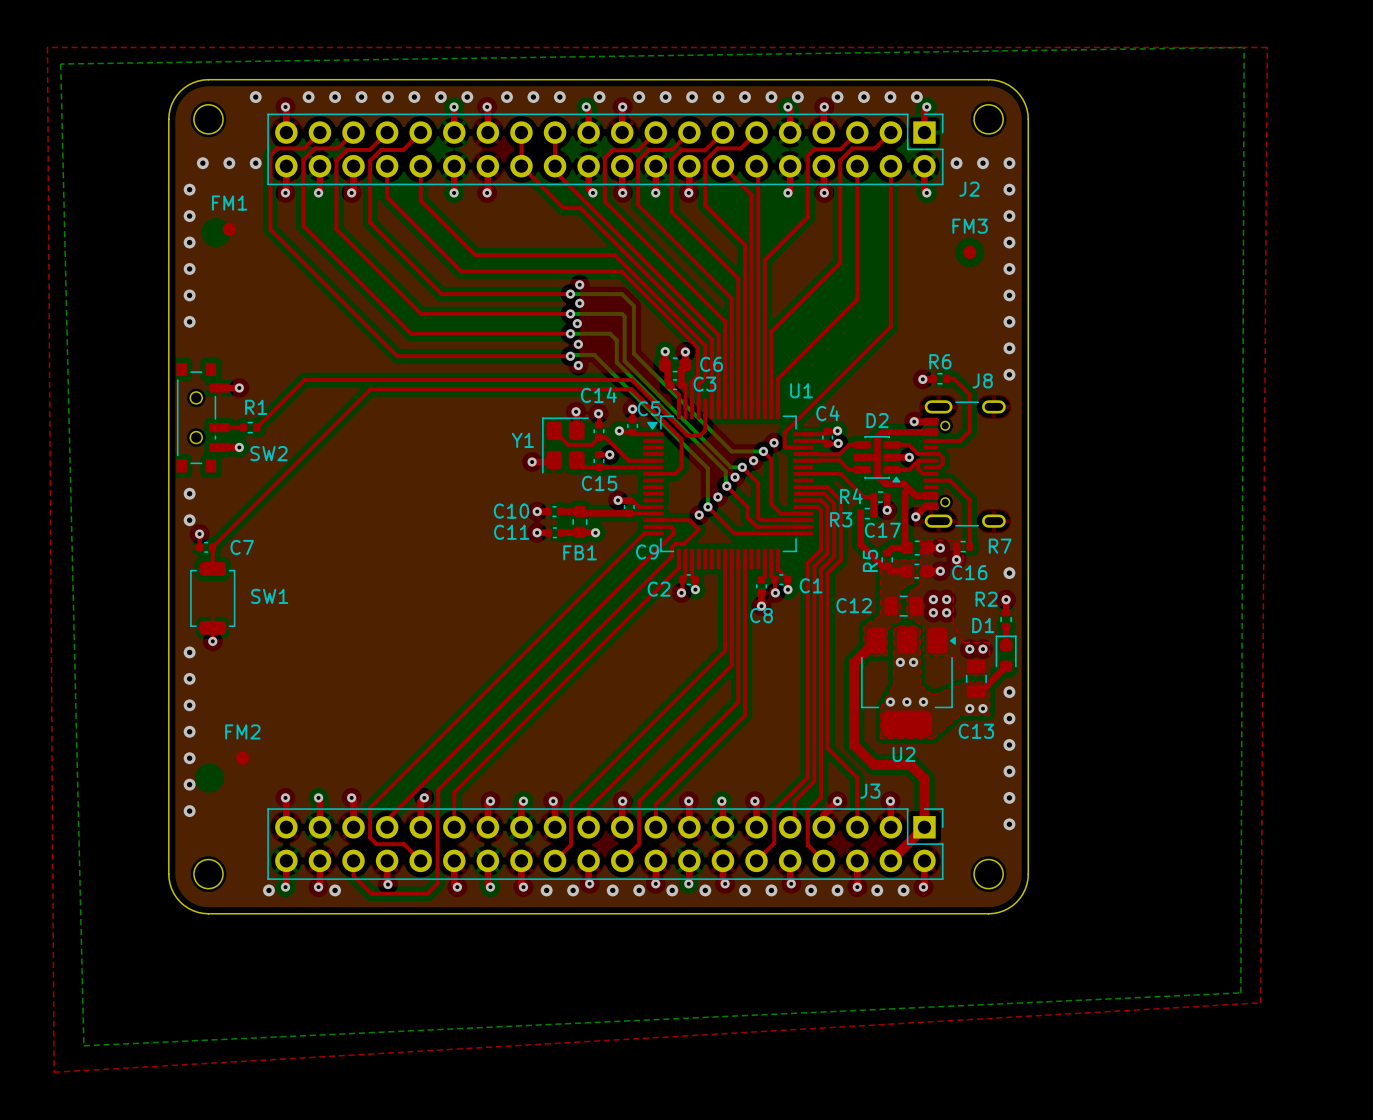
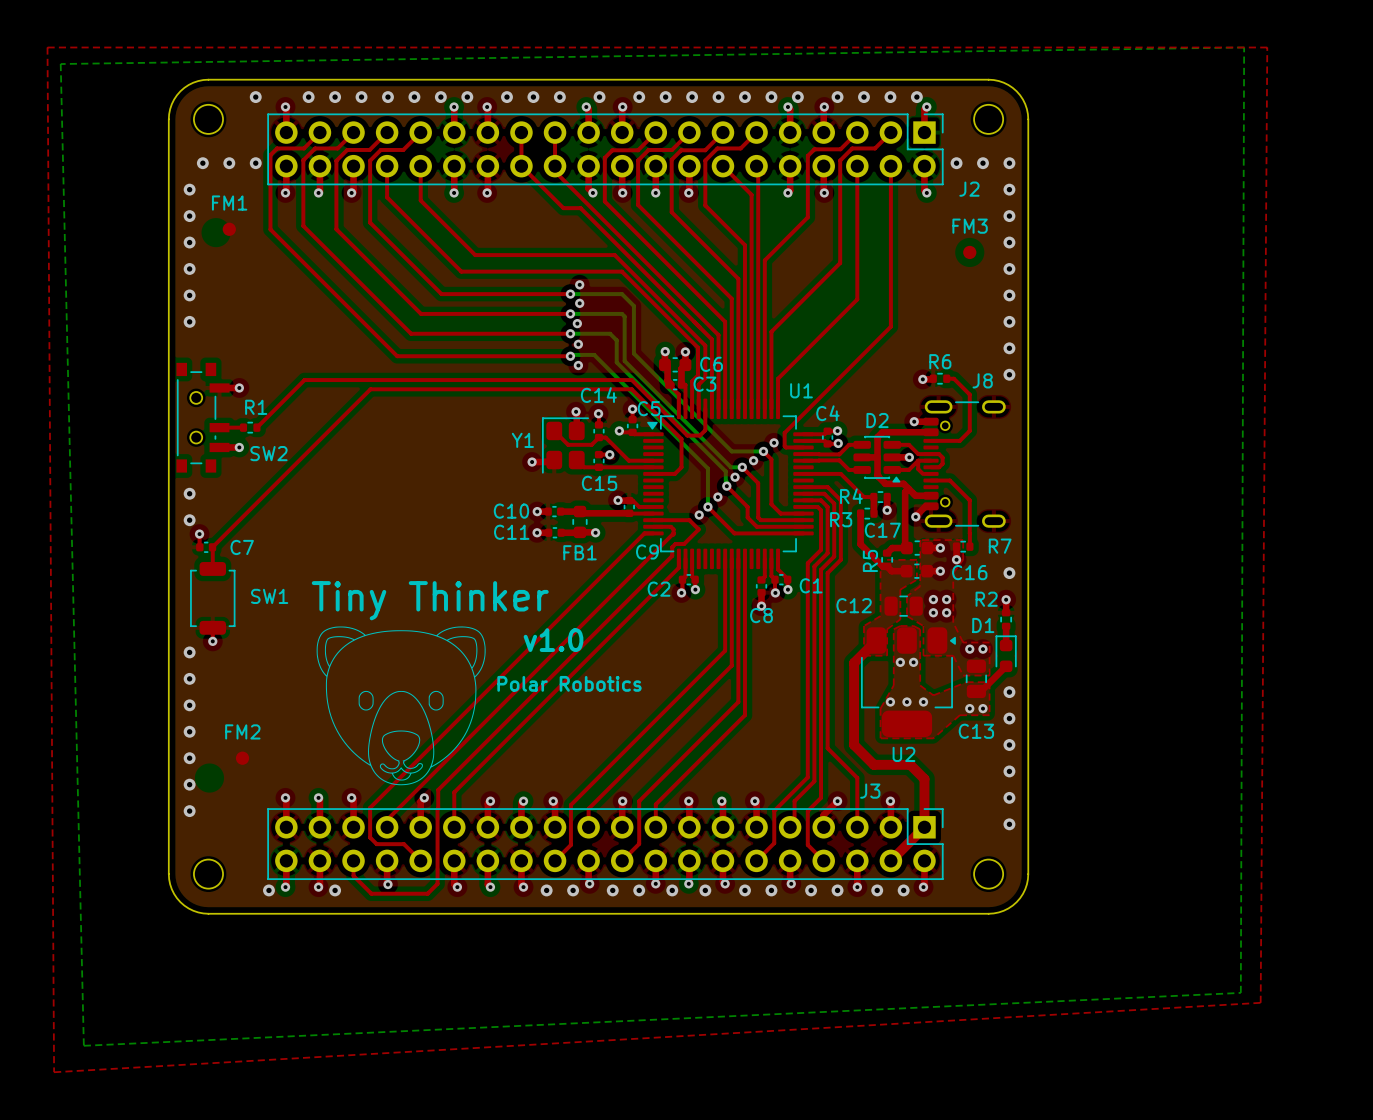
text: none -> Tiny Thinker (430, 600)
drawing: none -> [316, 626, 486, 786]
text: none -> v1.0 (553, 640)
text: none -> Polar Robotics (569, 683)

